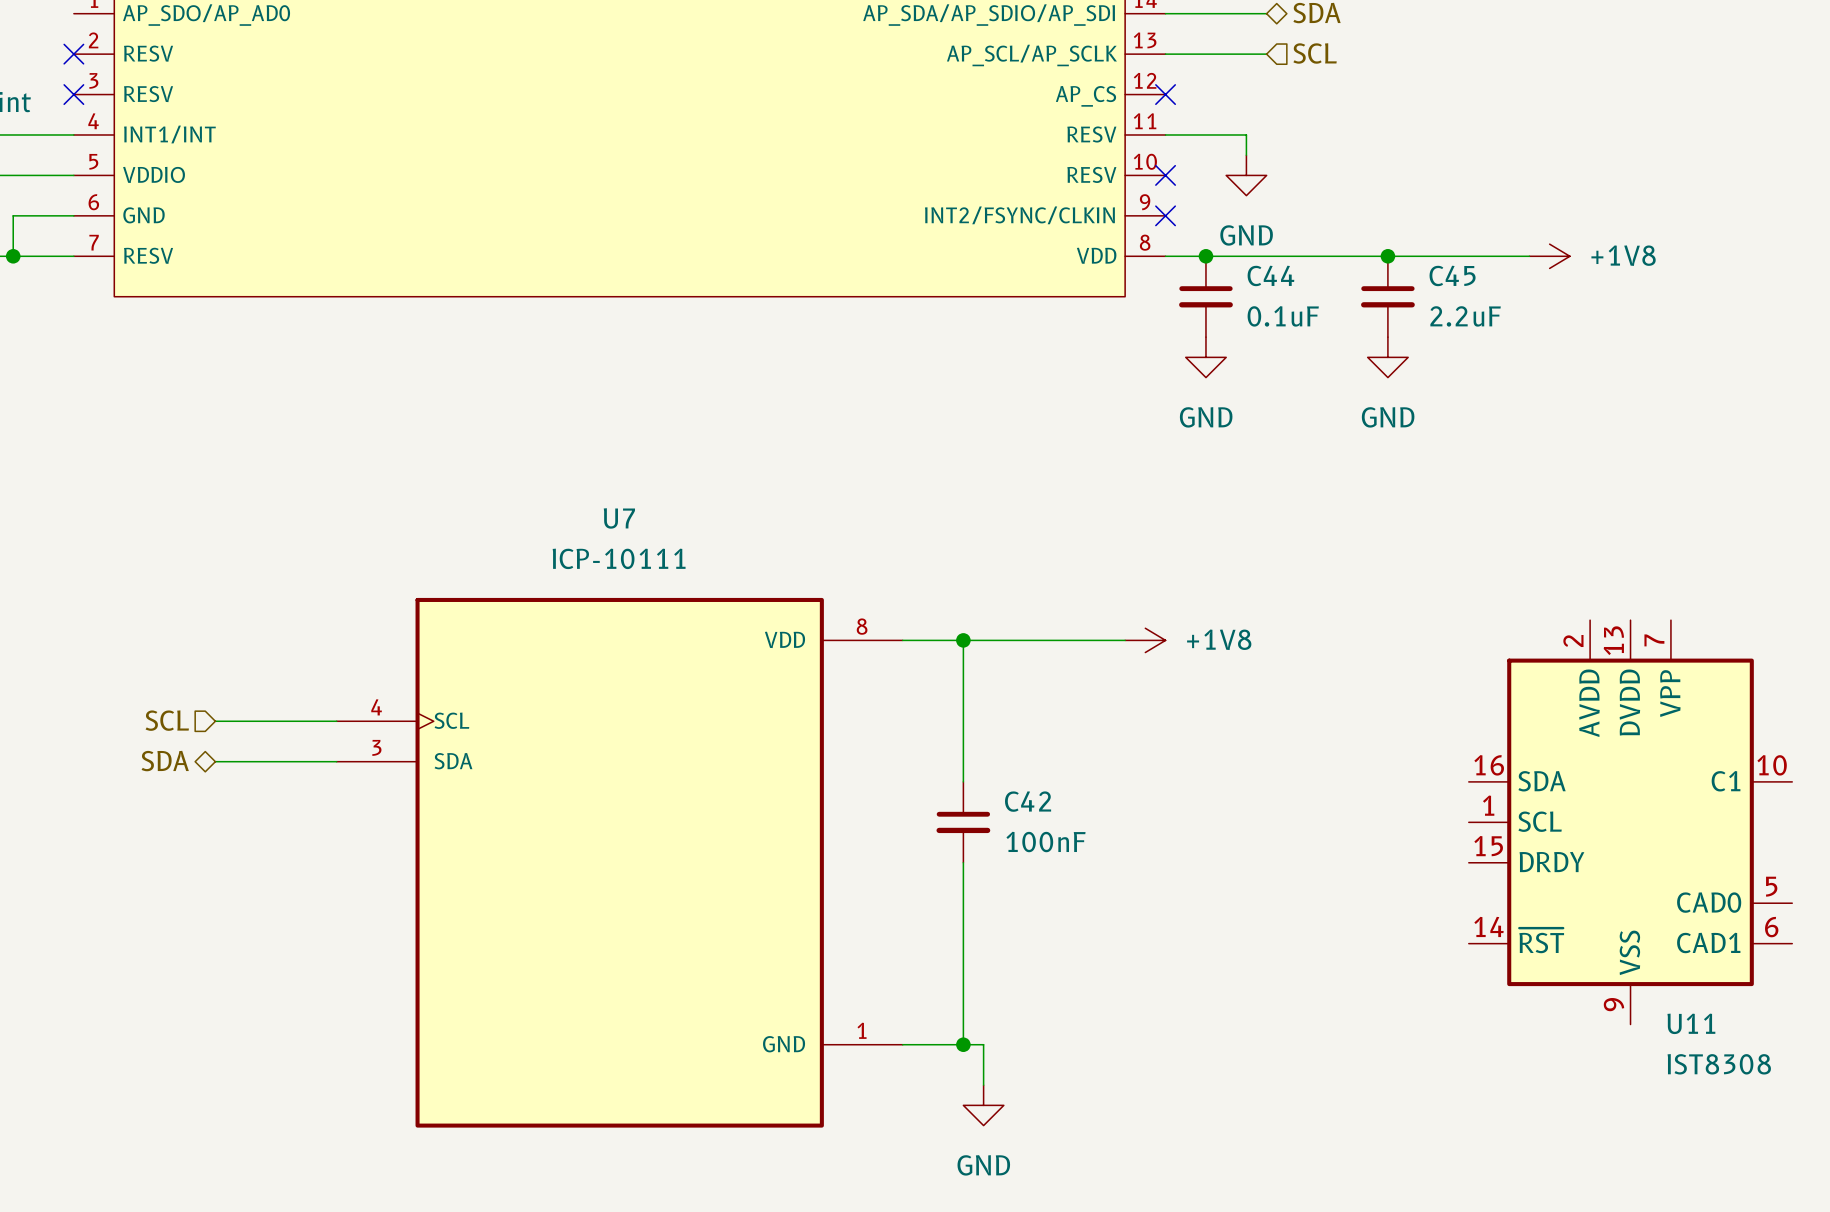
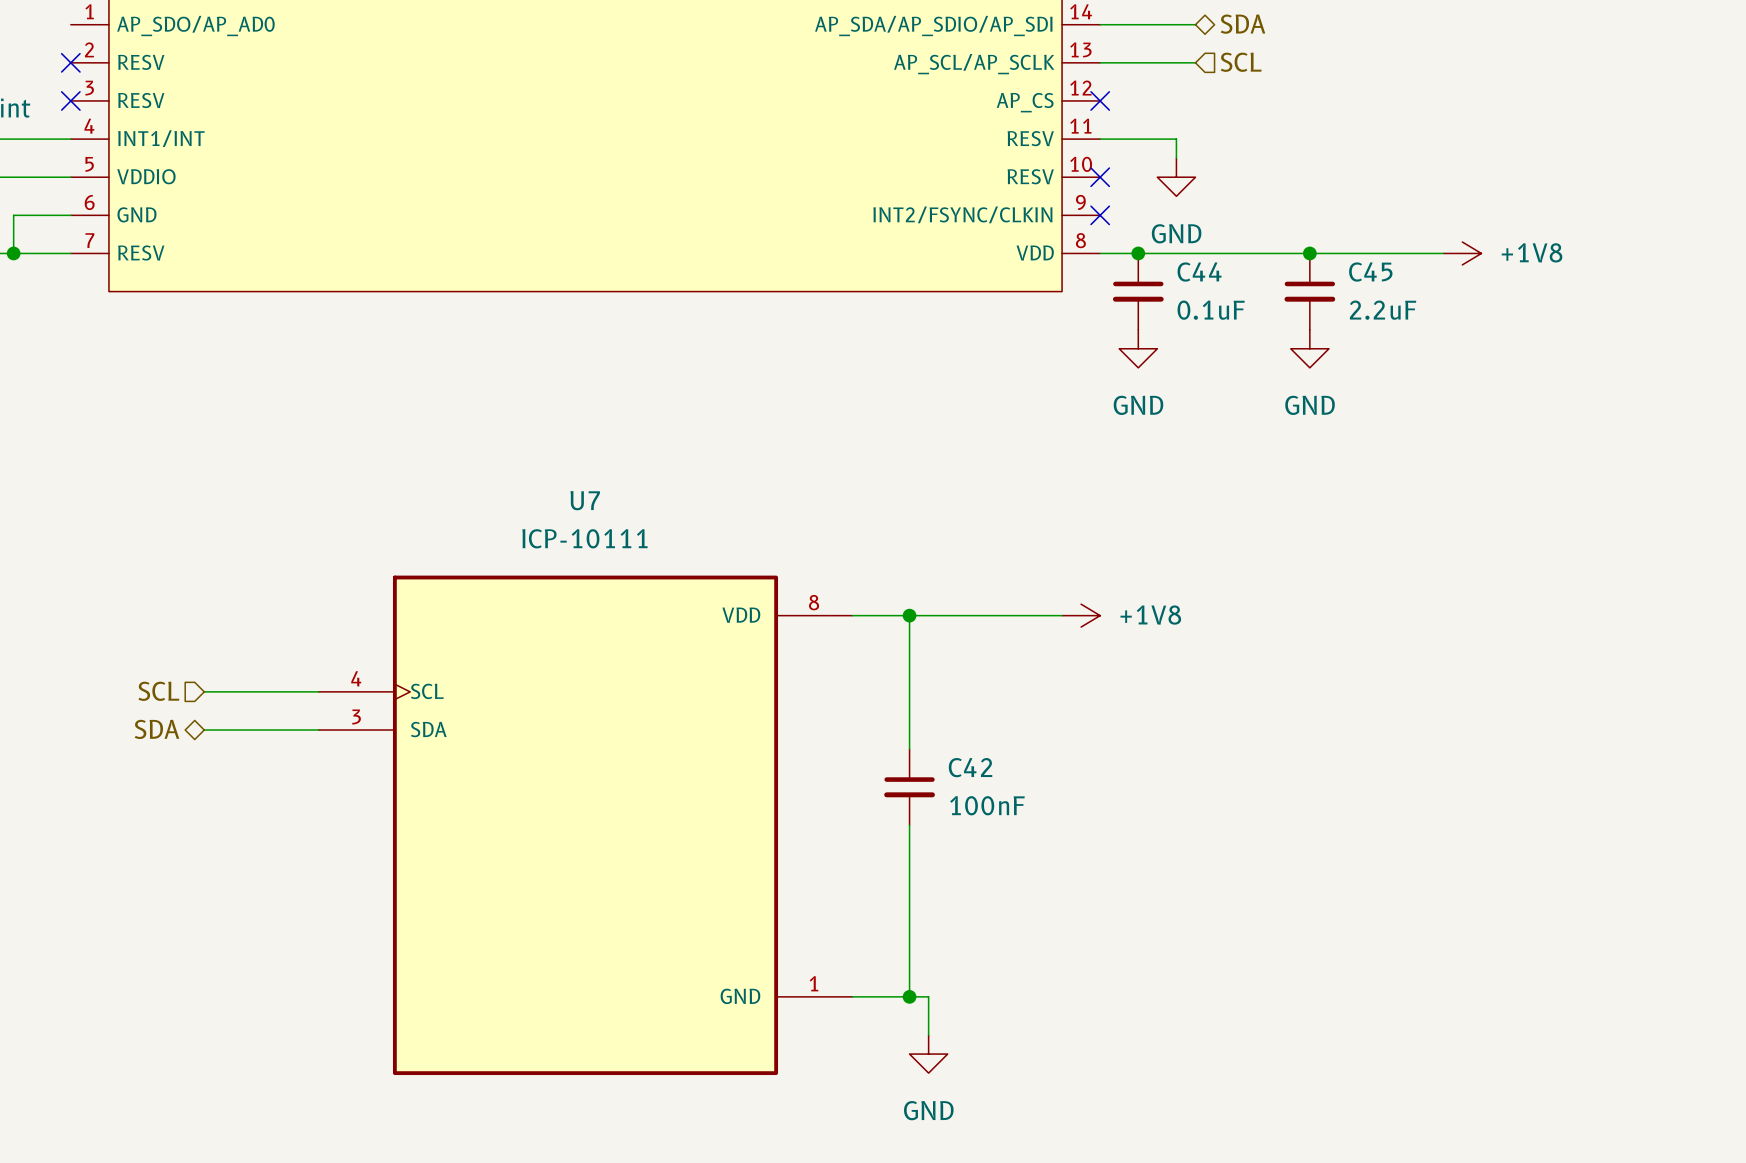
U11: IST8308 (1630, 822) -> none

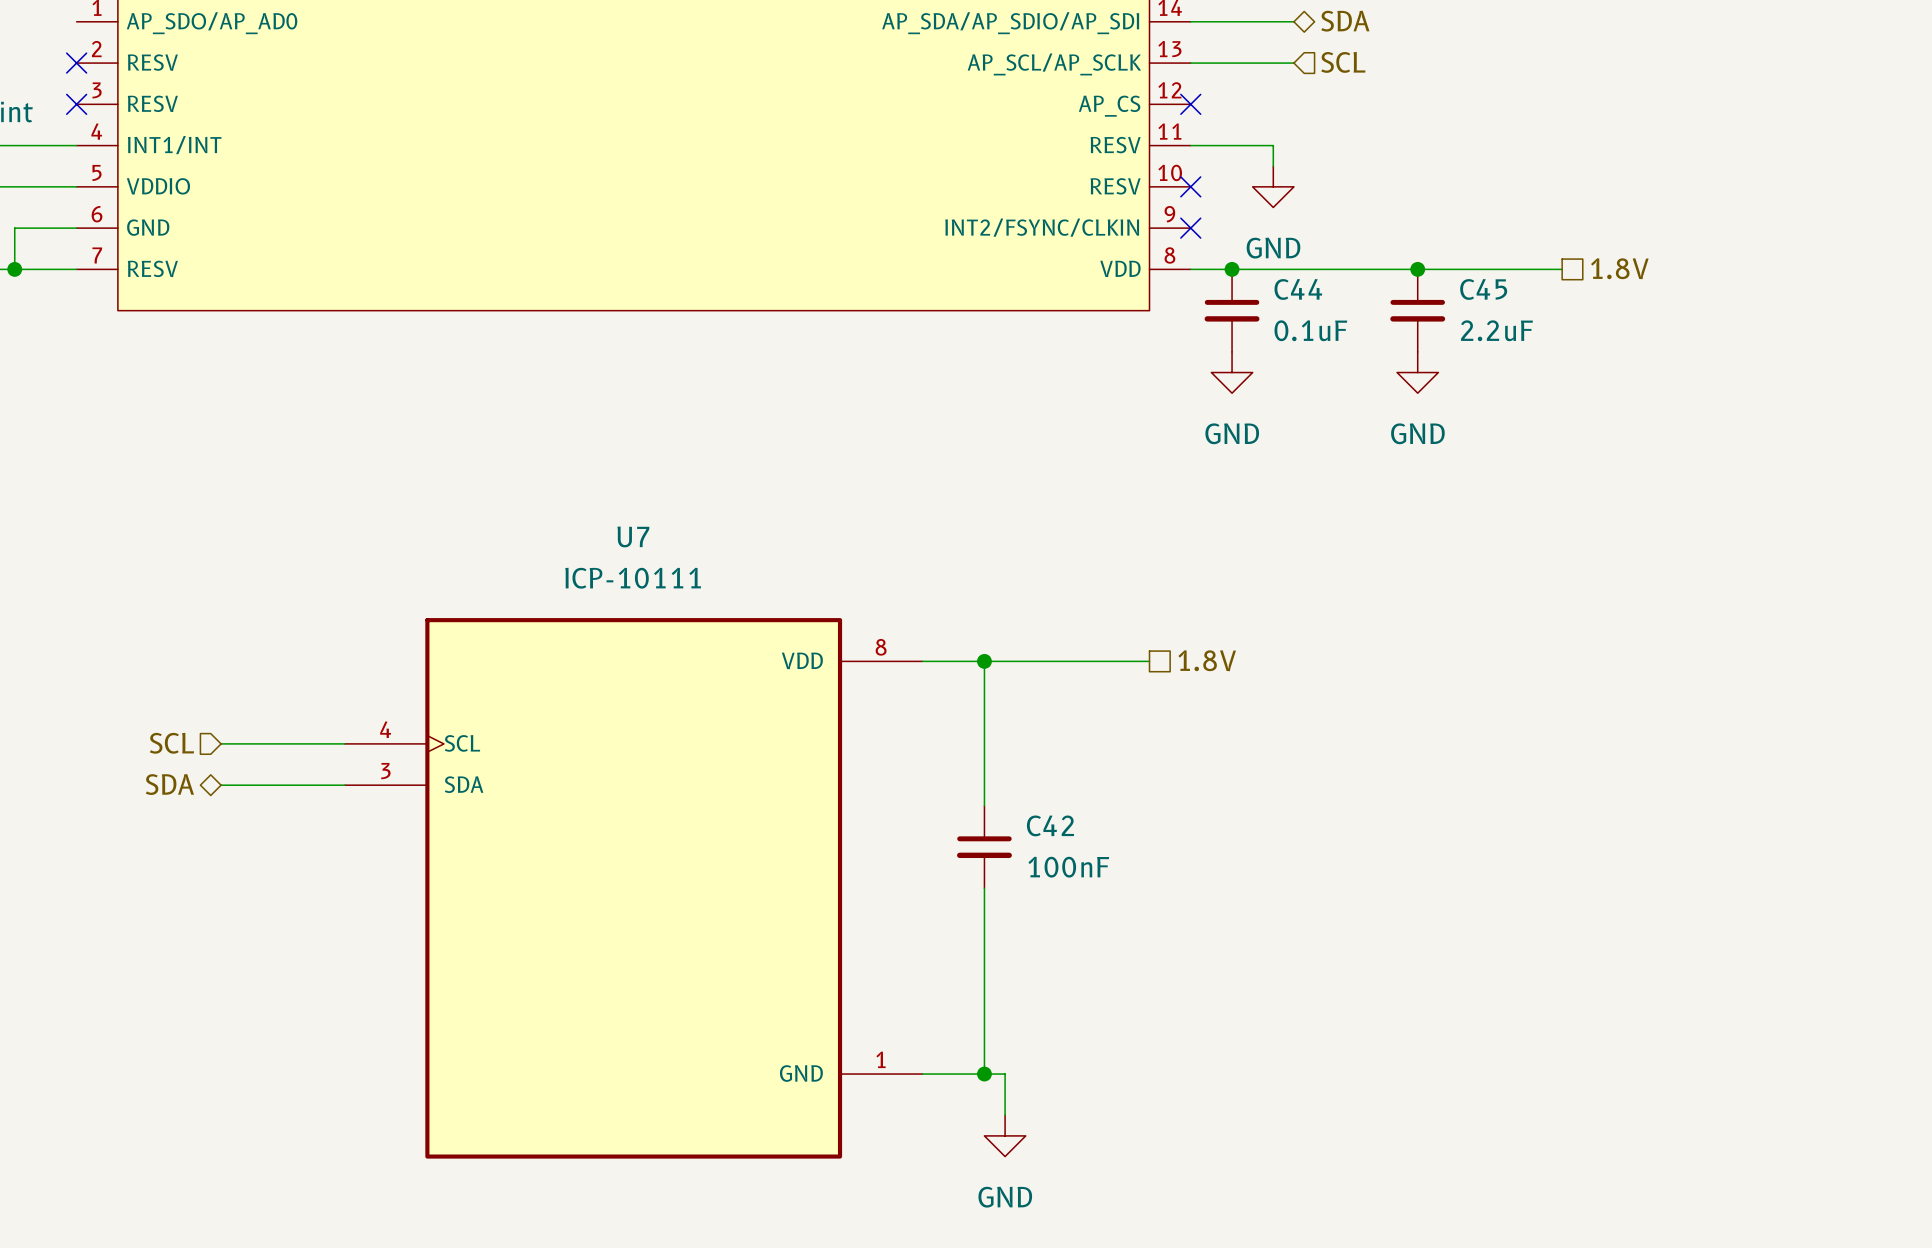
hierarchical label: none -> 1.8V (1619, 268)
power symbol: +1V8 (1462, 253) -> none
power symbol: +1V8 (1081, 615) -> none
hierarchical label: none -> 1.8V (1207, 660)

